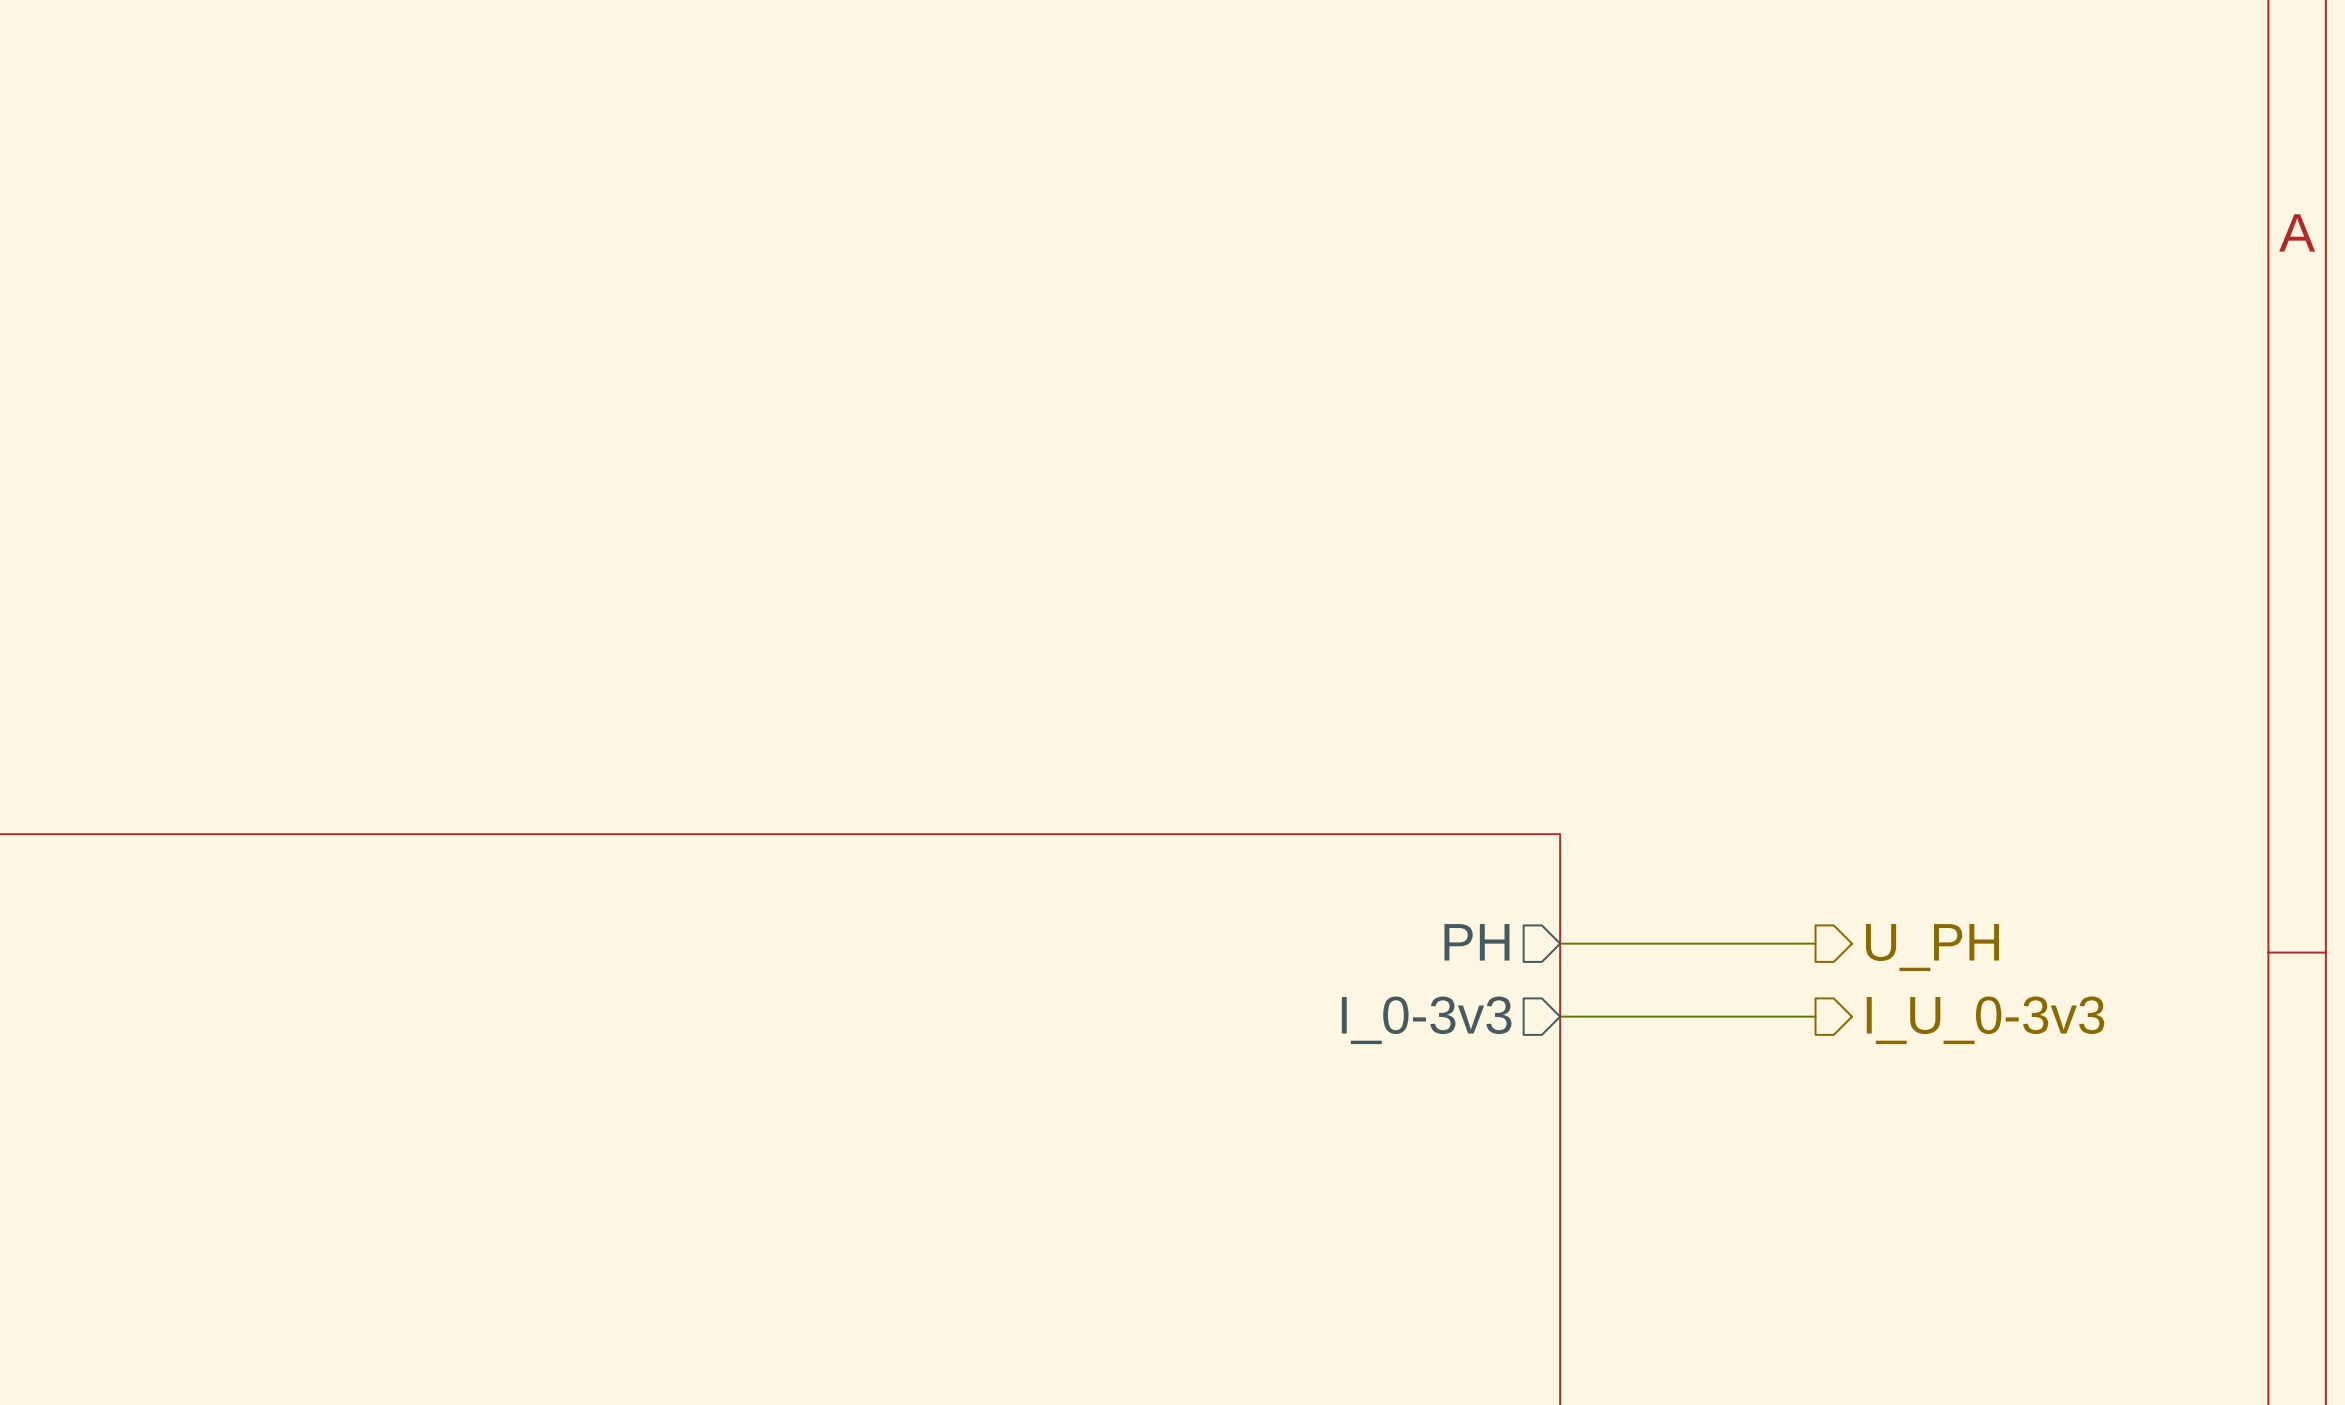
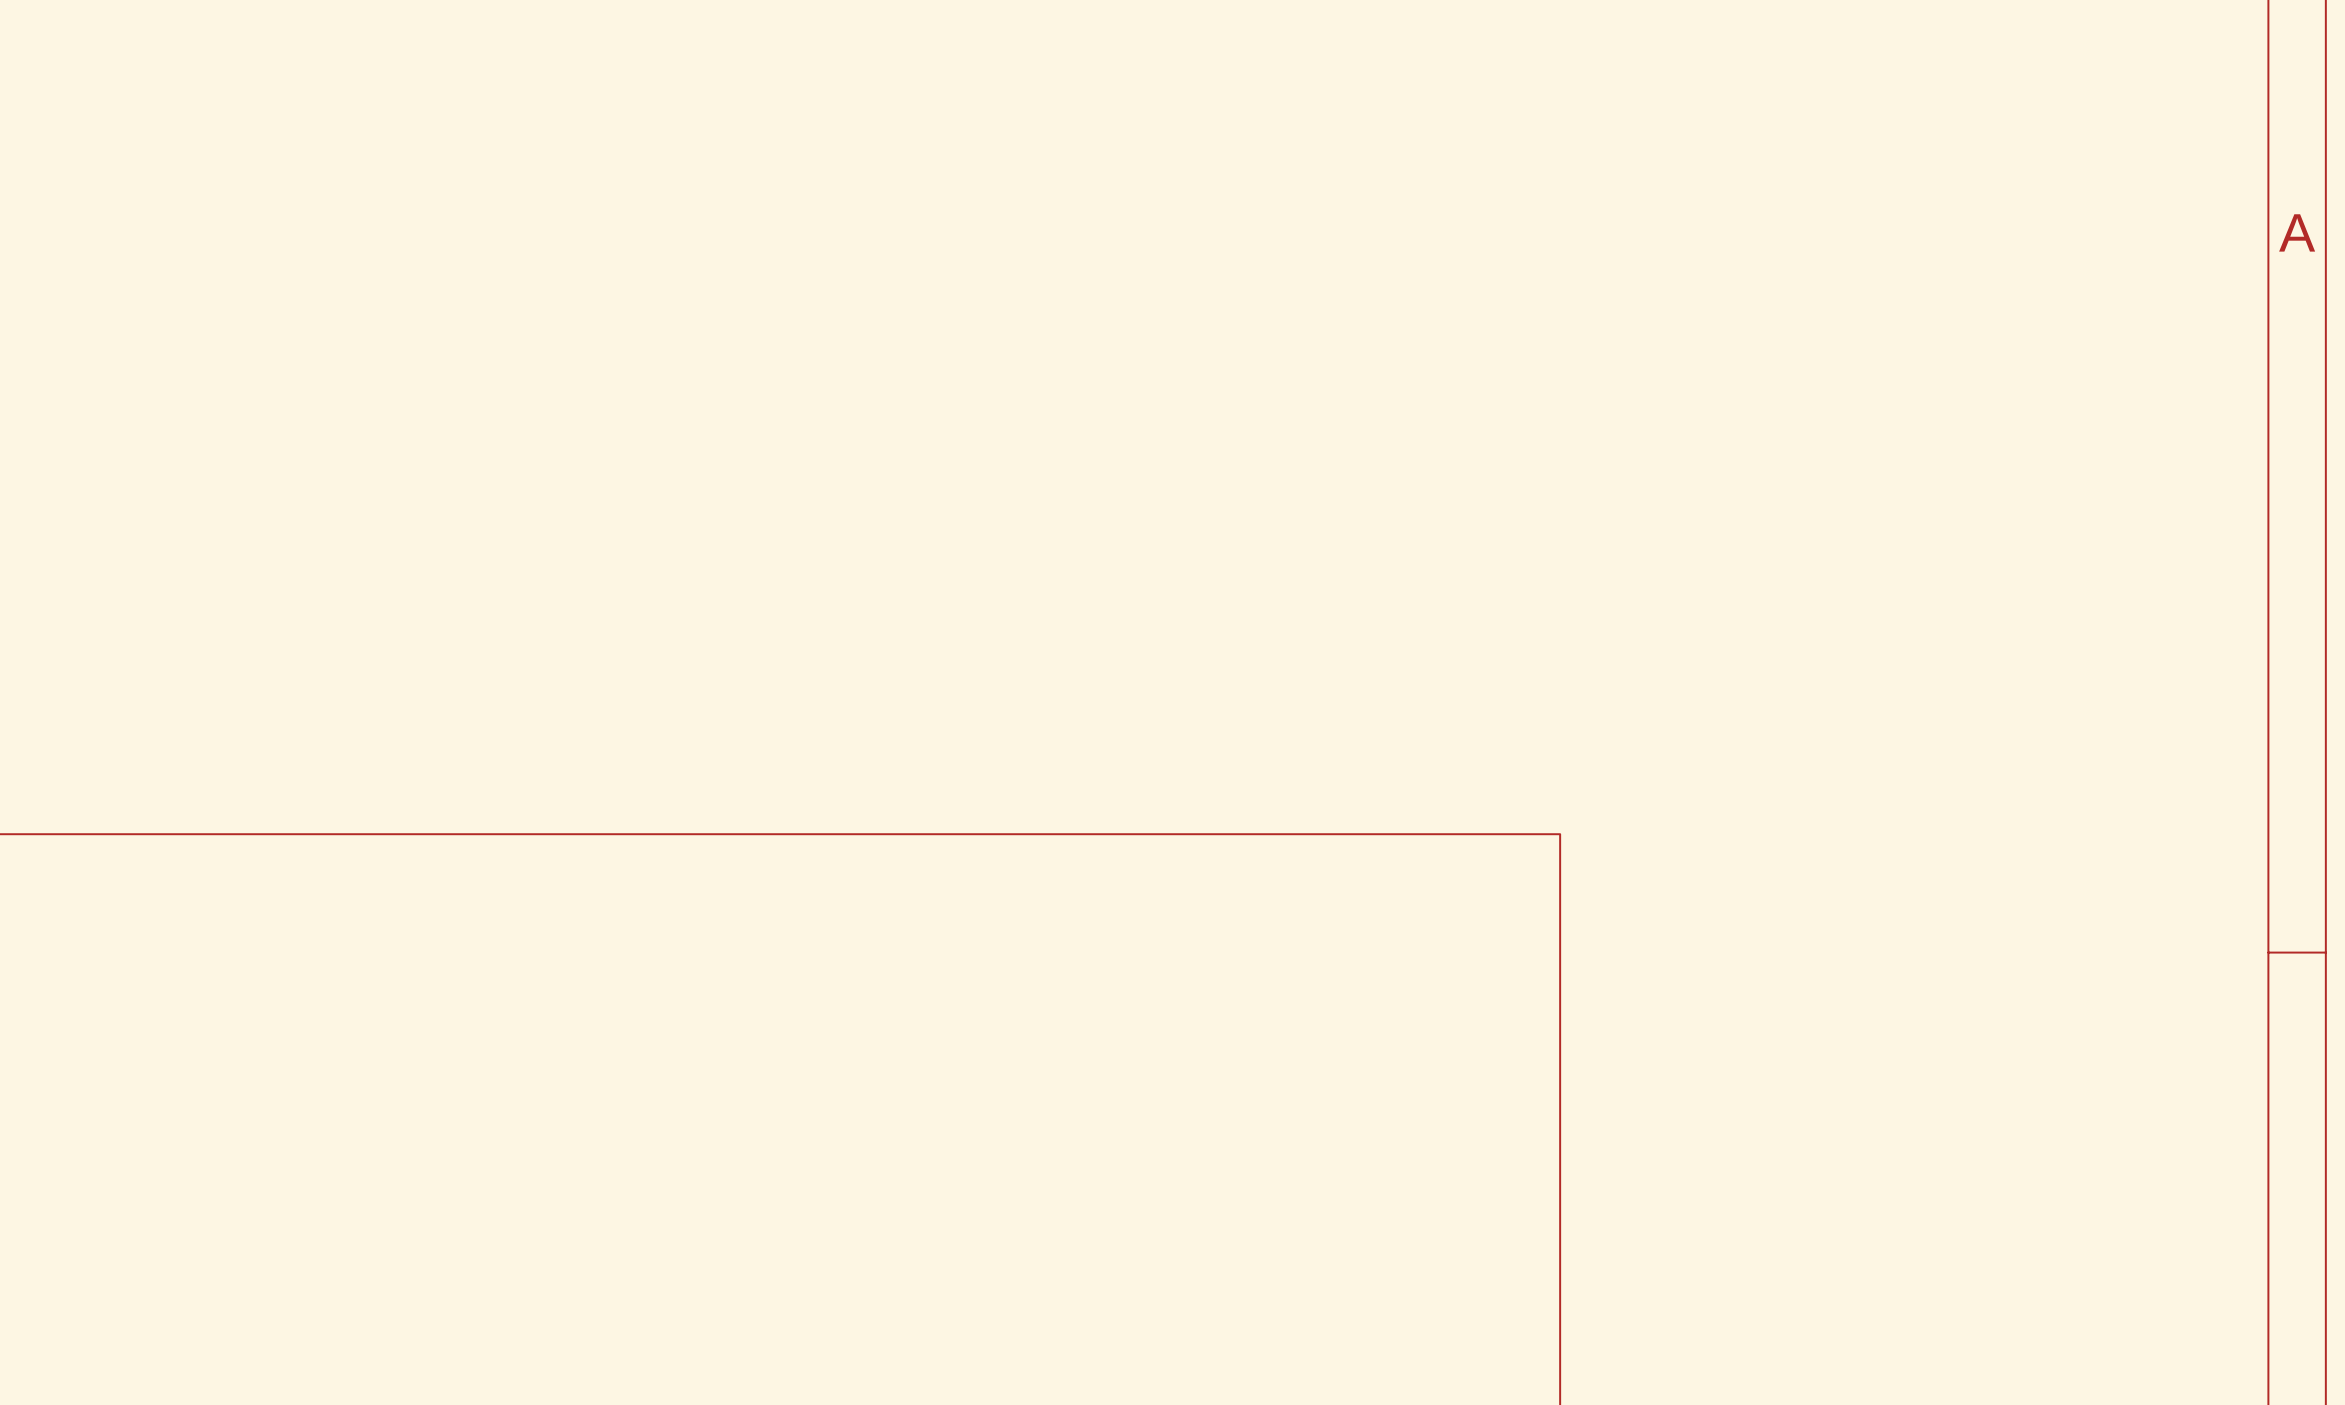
sheet pin: PH (1476, 942) -> none
wire: (1560, 943) (1815, 943) -> none
hierarchical label: U_PH (1932, 947) -> none
wire: (1560, 1016) (1815, 1016) -> none
sheet pin: I_0-3v3 (1426, 1020) -> none
hierarchical label: I_U_0-3v3 (1985, 1020) -> none

